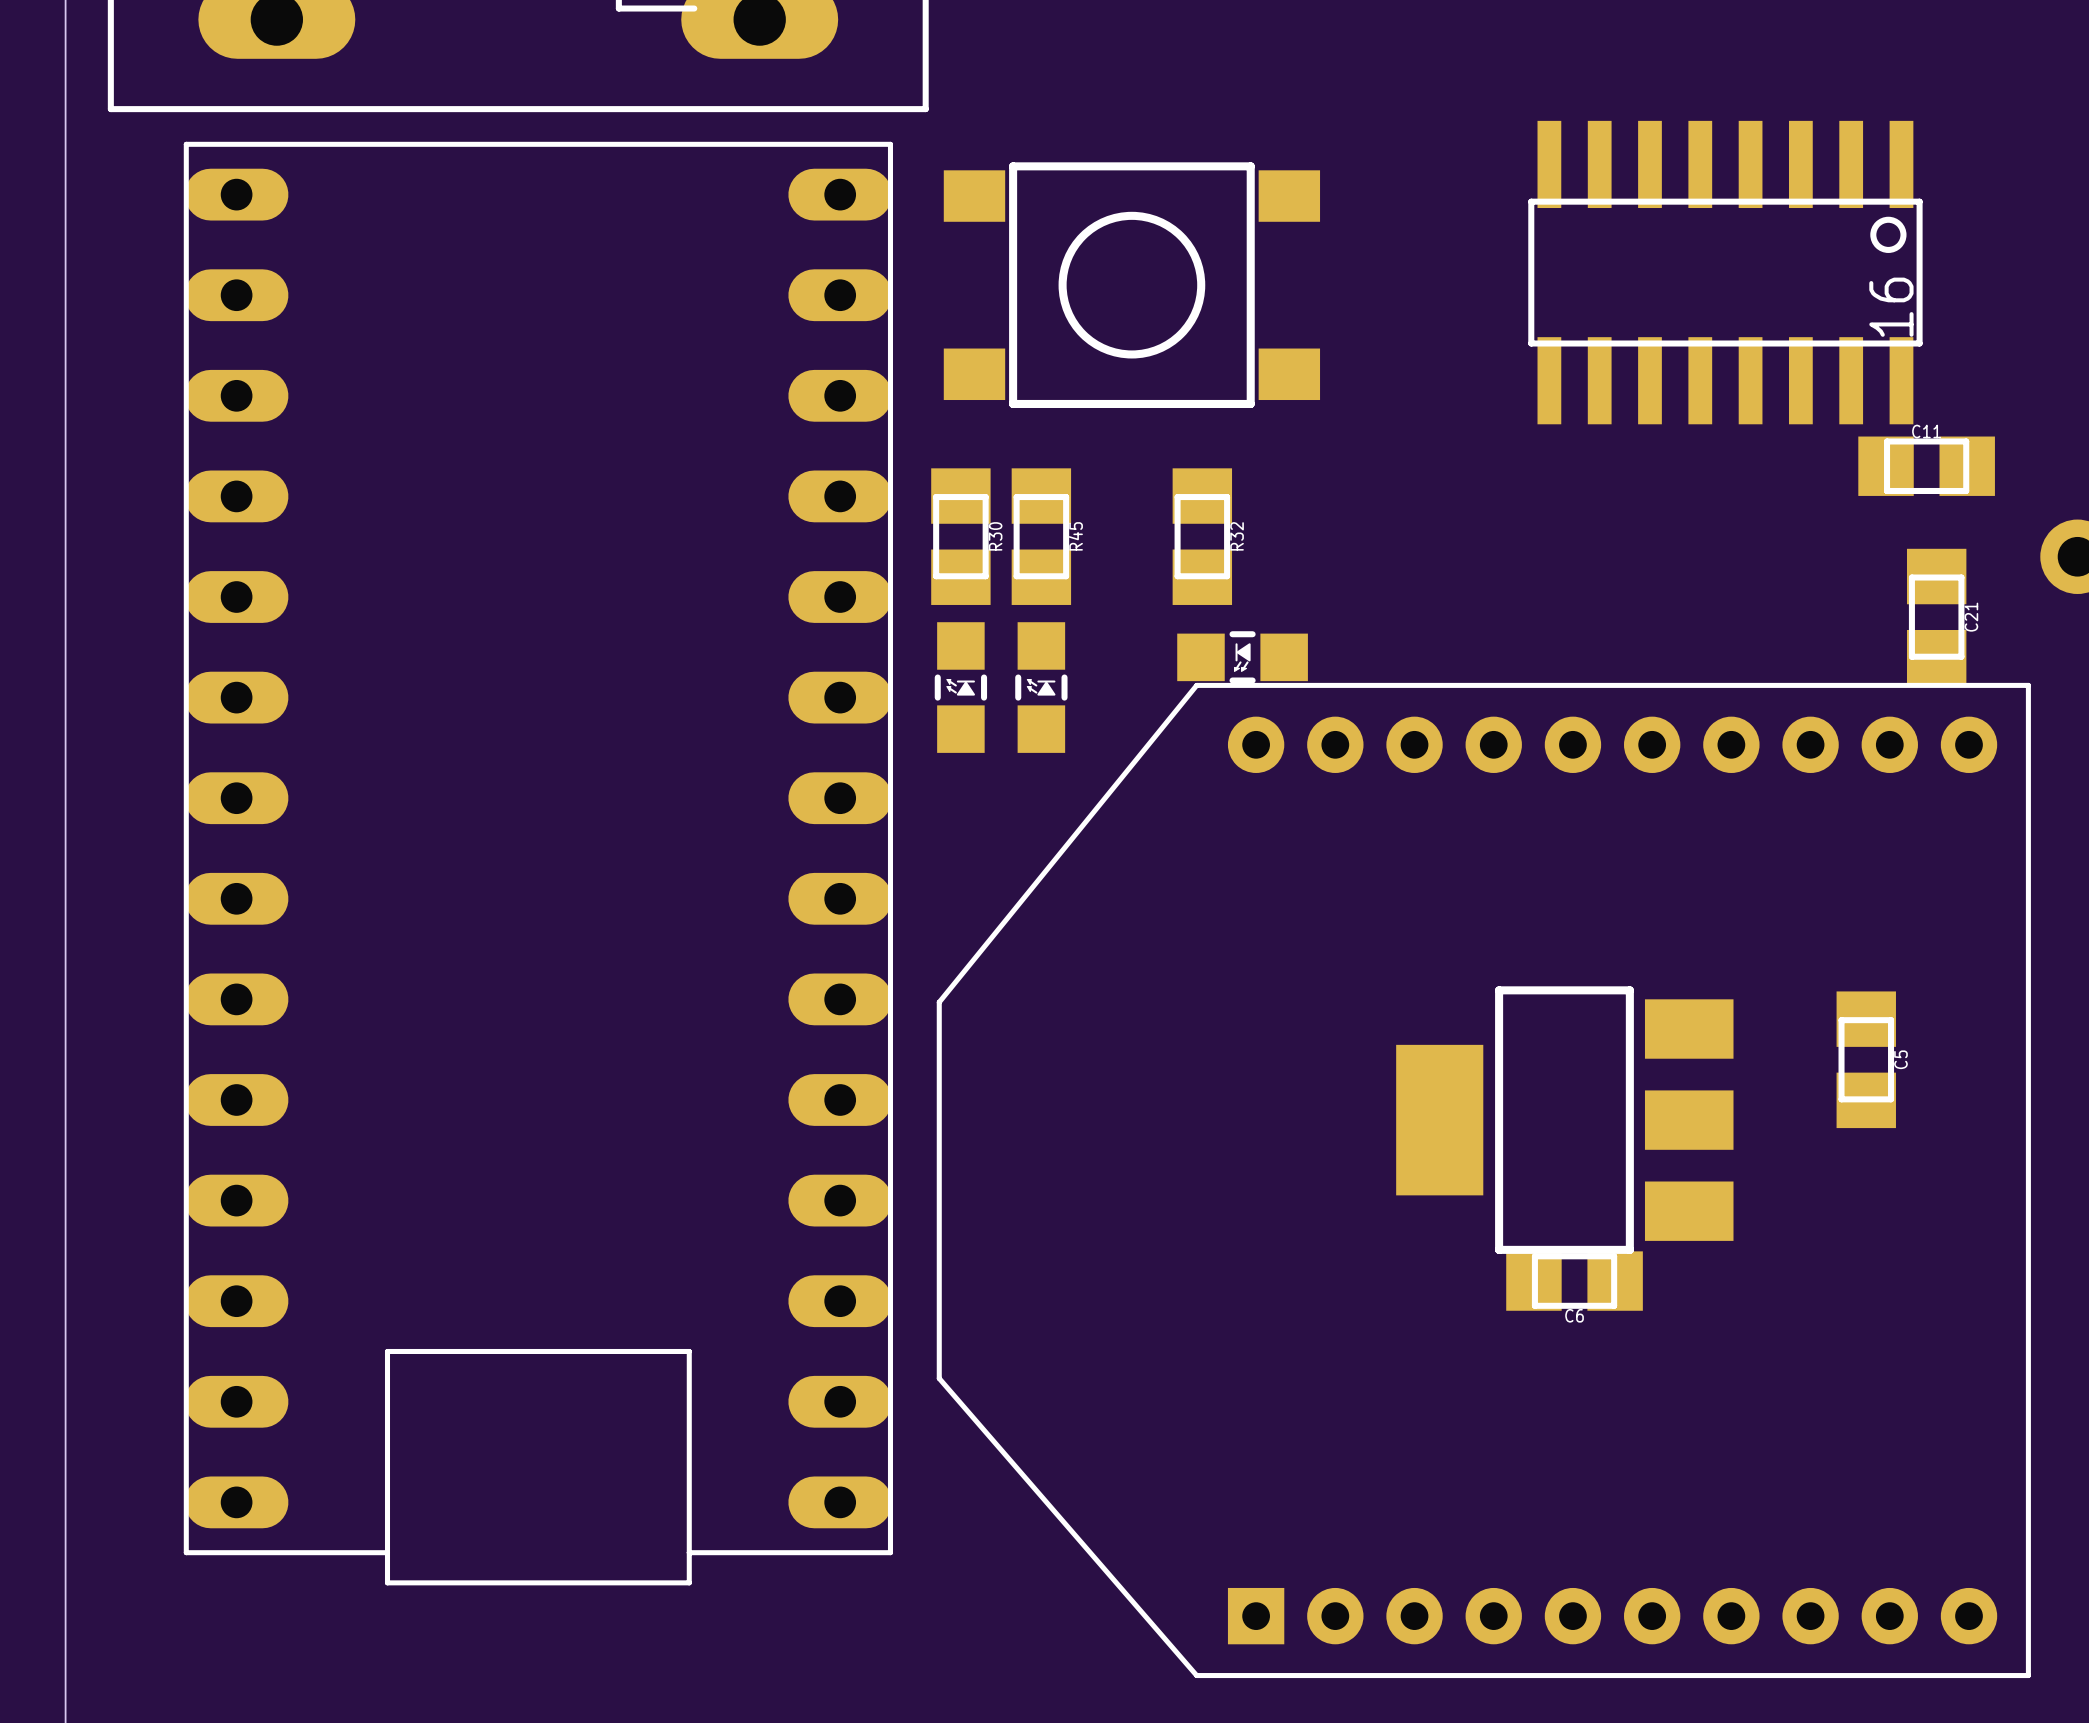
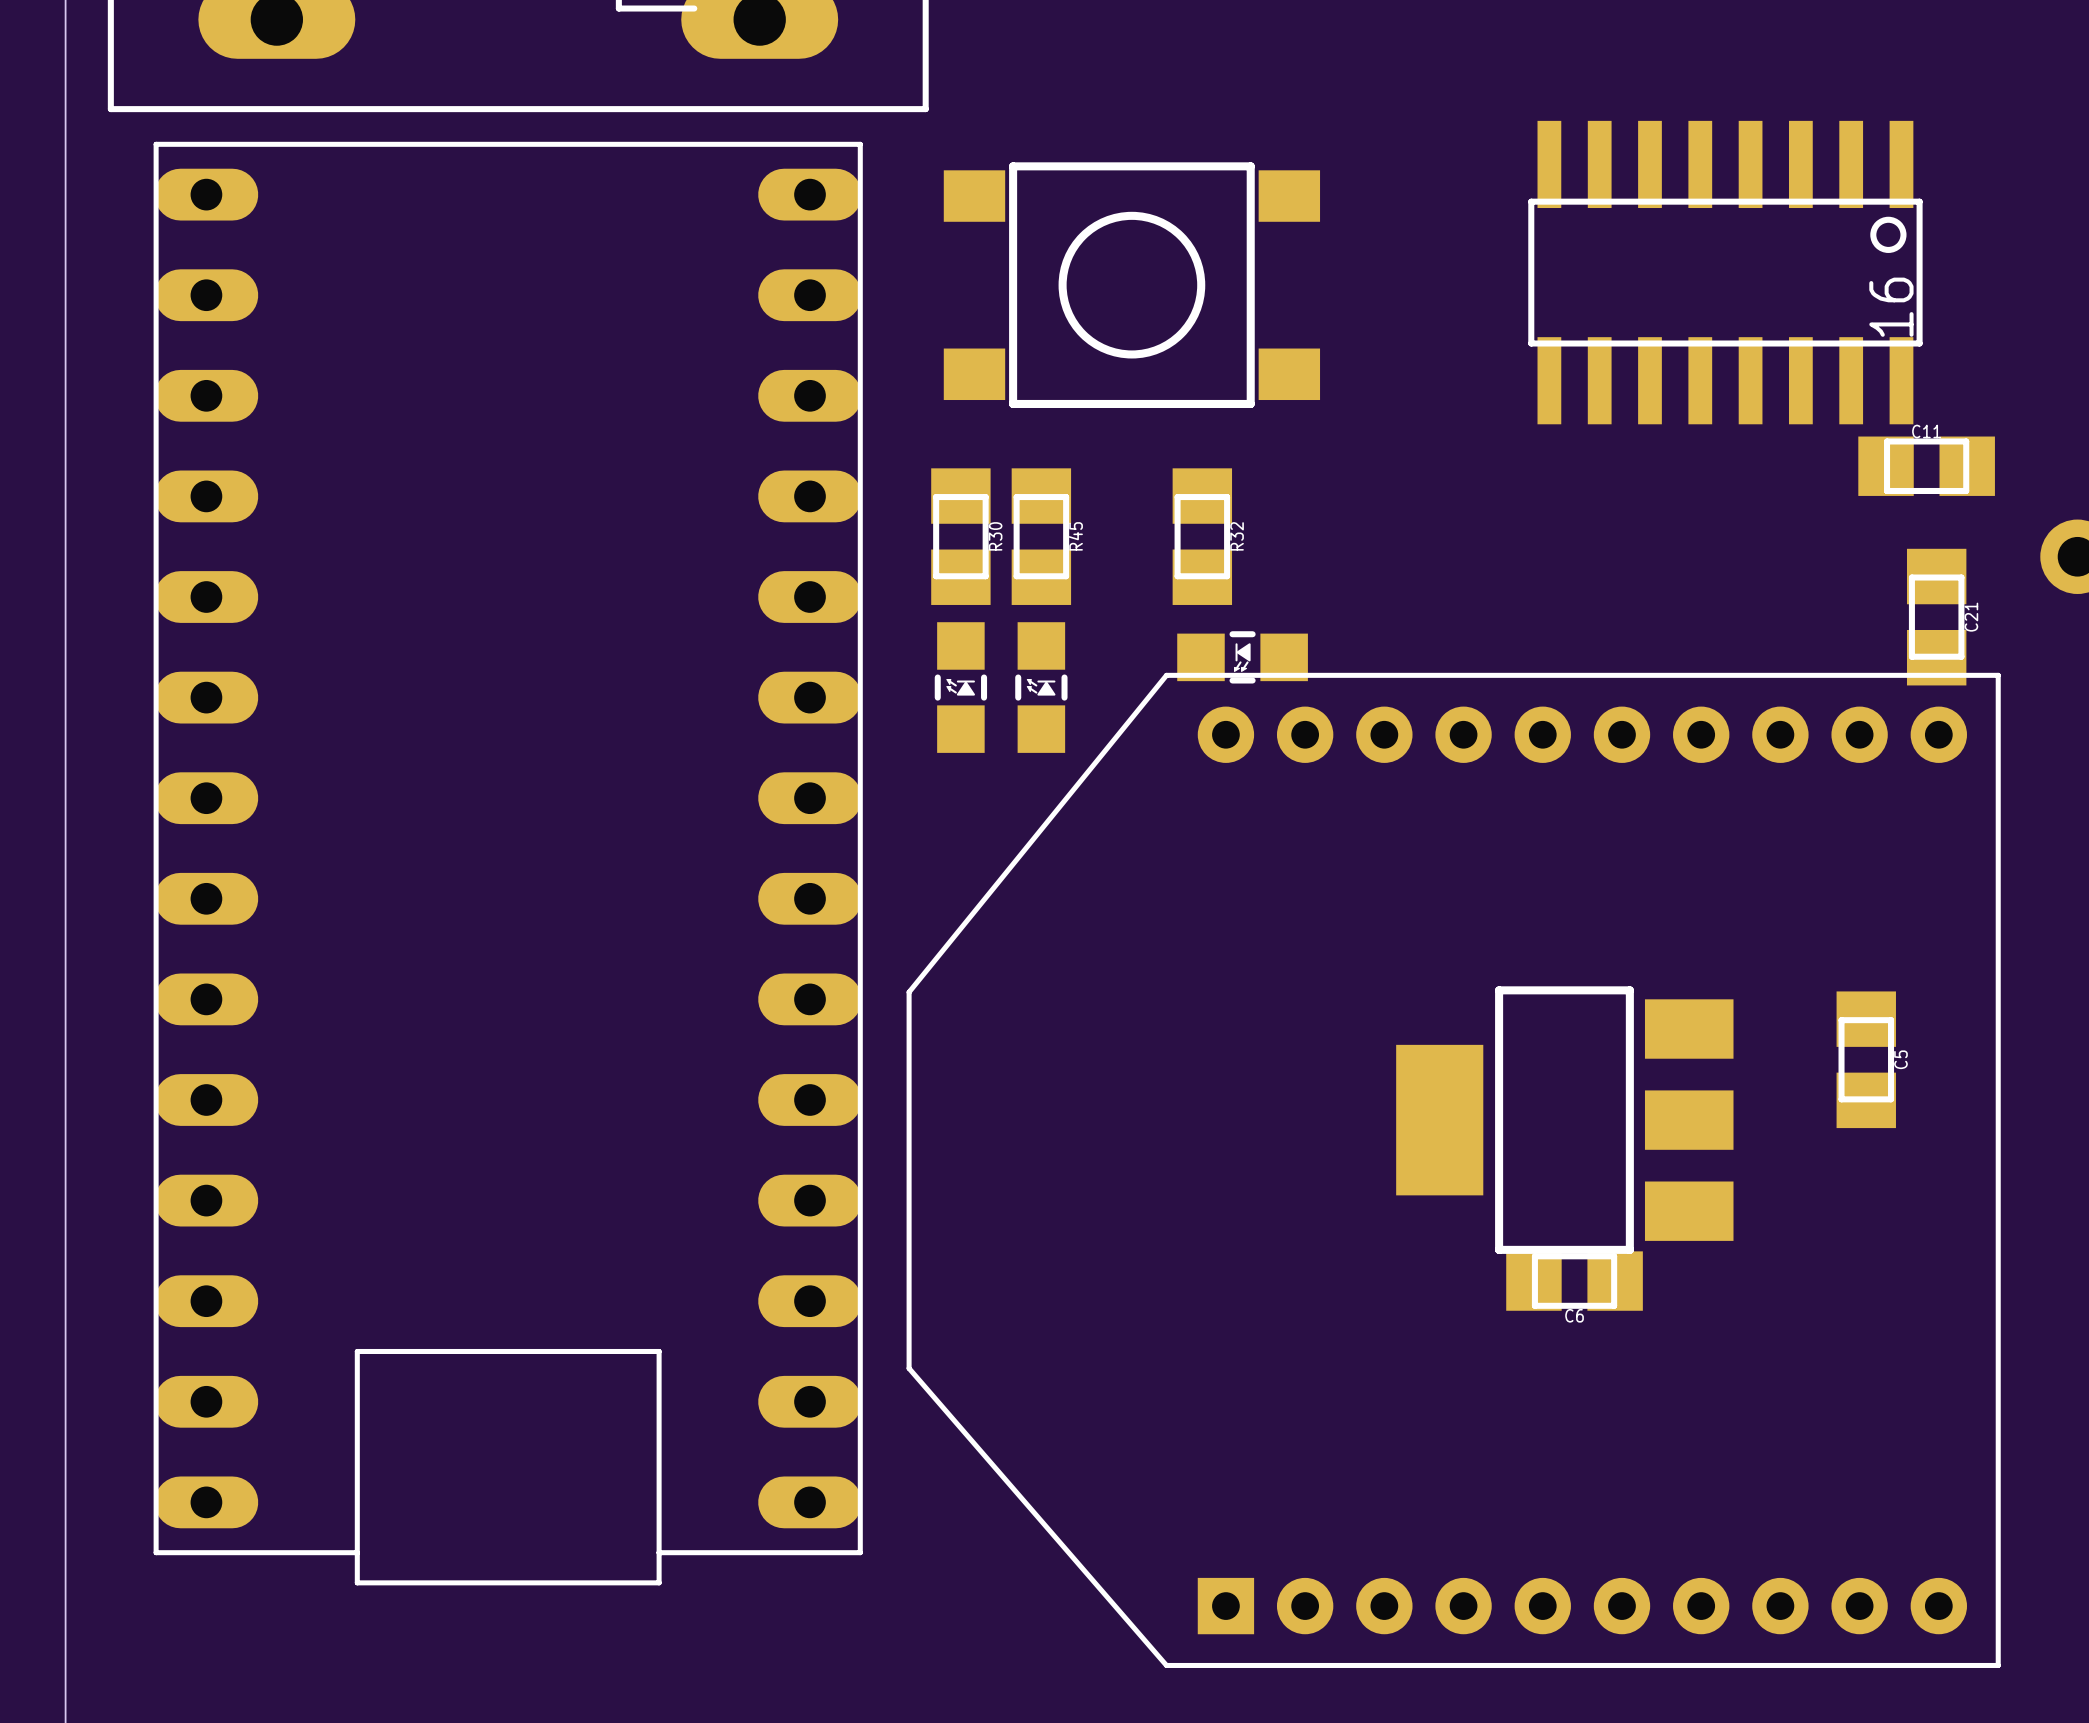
part position: (538, 863) -> (508, 863)
part position: (1483, 1180) -> (1453, 1170)

